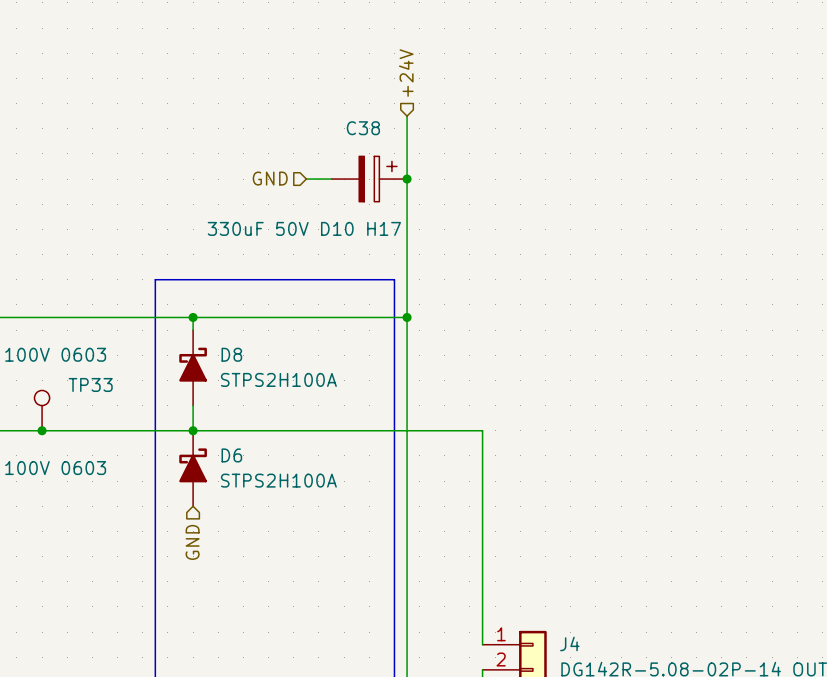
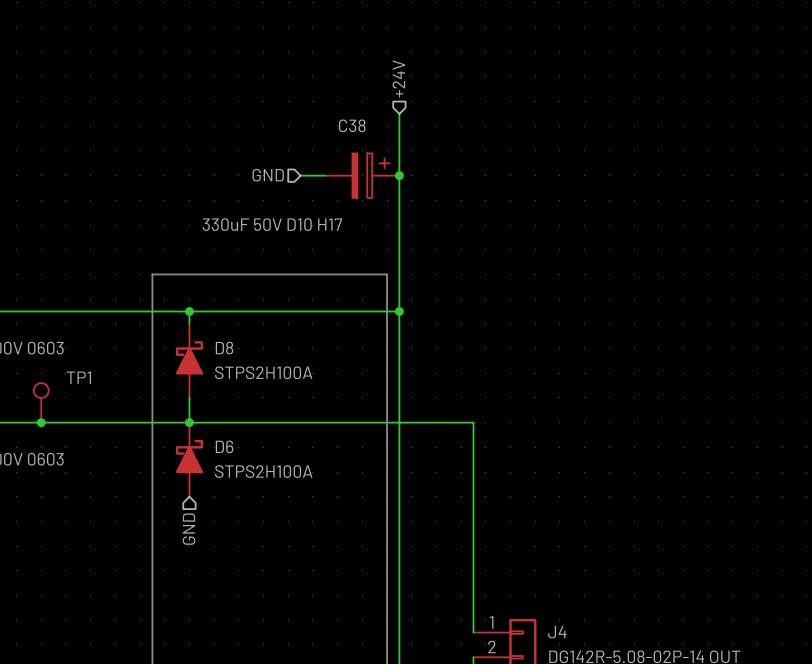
TP33 name: TP33 (90, 384) -> TP1 (78, 377)

